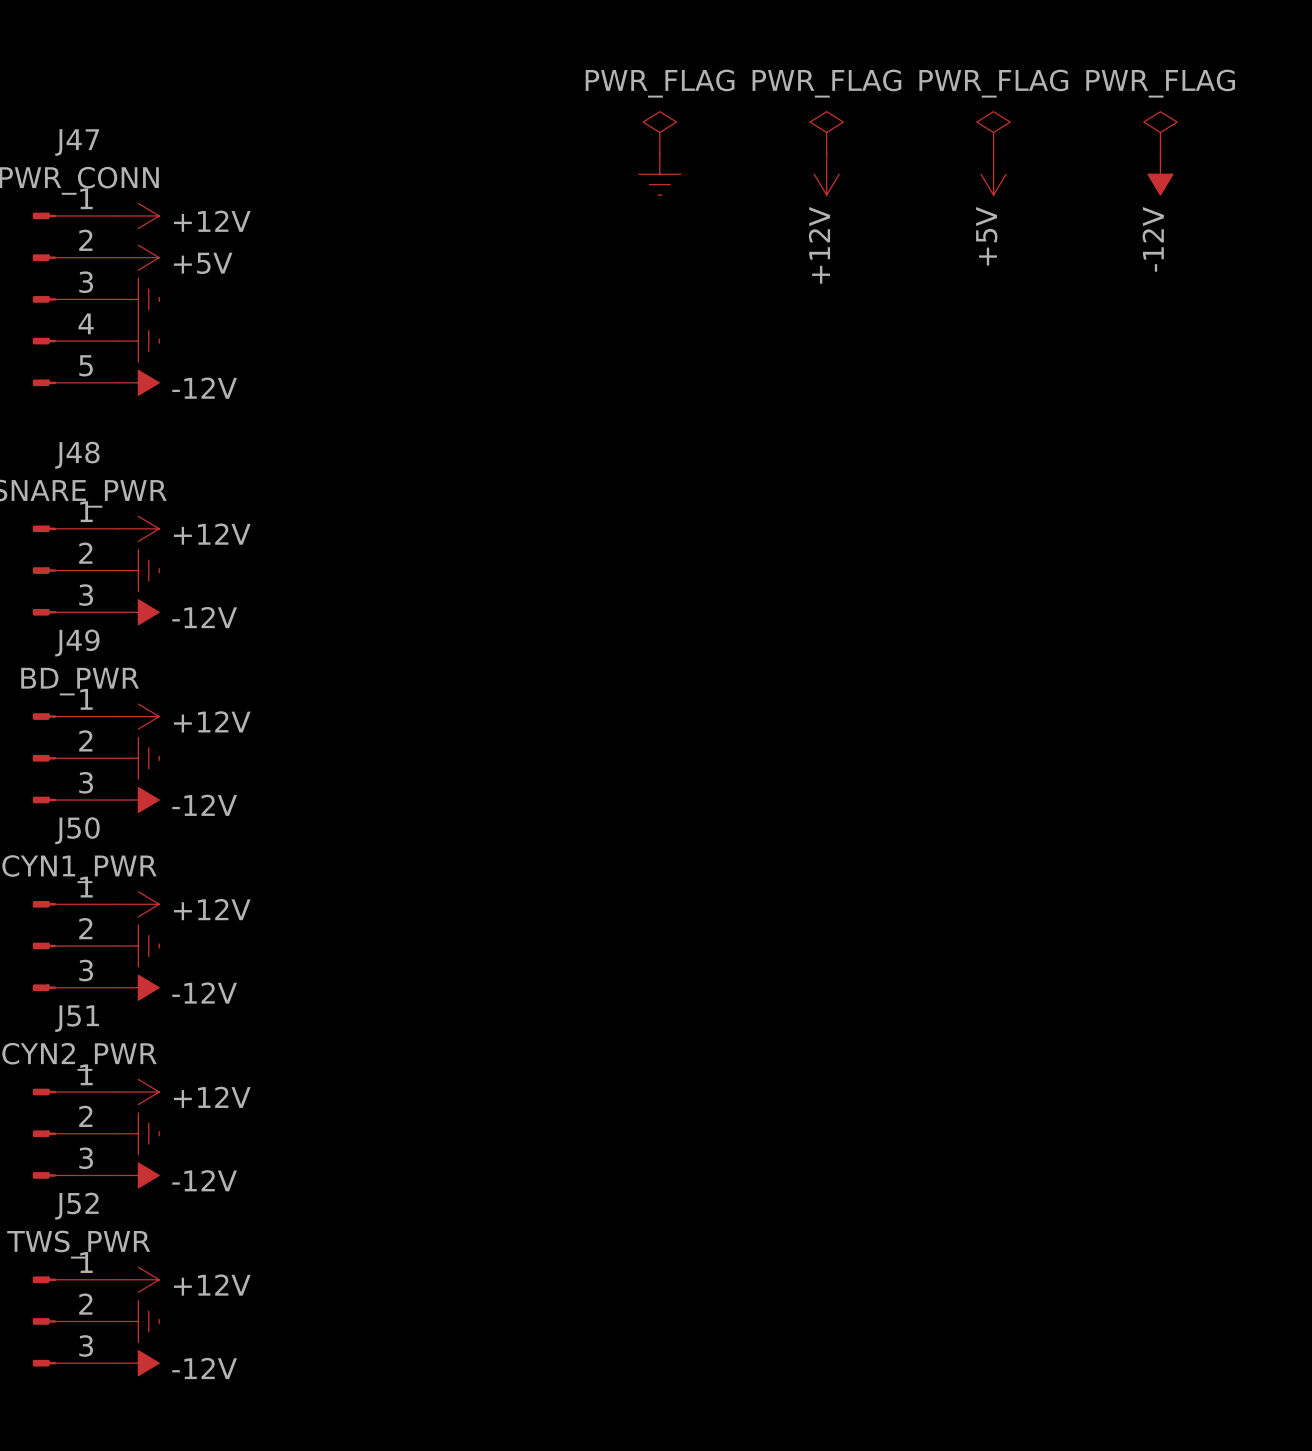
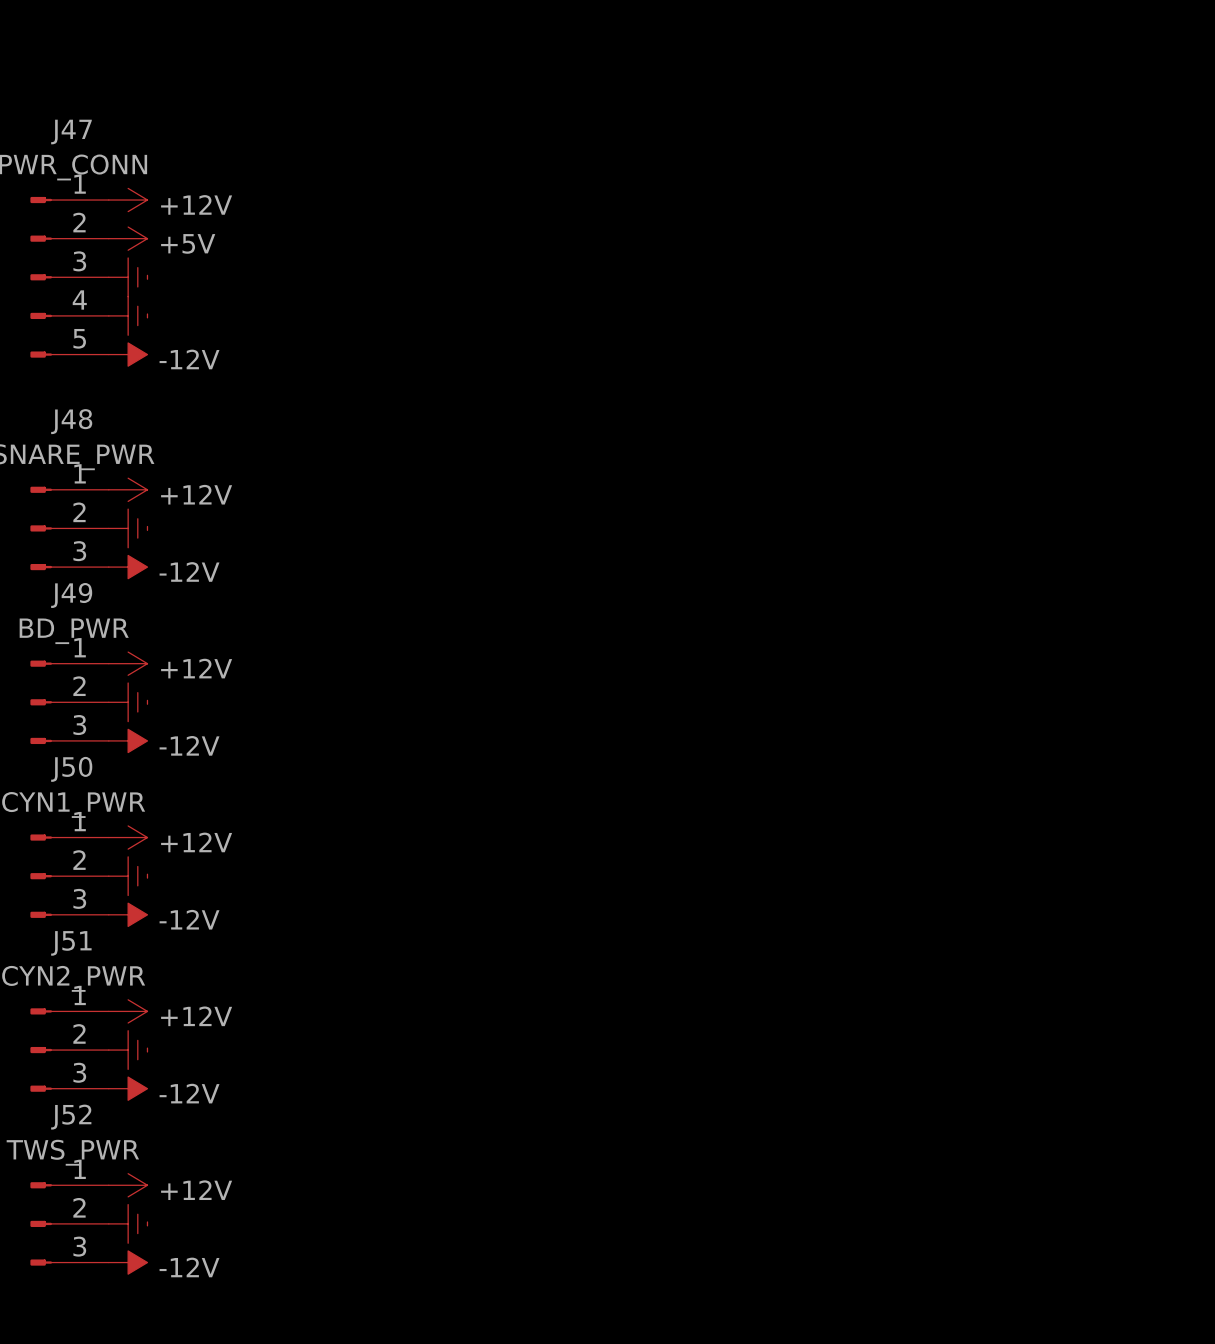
power symbol: PWR_FLAG (659, 132) -> none
power symbol: PWR_FLAG (826, 132) -> none
power symbol: PWR_FLAG (993, 132) -> none
power symbol: PWR_FLAG (1160, 132) -> none
power symbol: (659, 174) -> none
power symbol: +12V (826, 174) -> none
power symbol: +5V (993, 174) -> none
power symbol: -12V (1160, 174) -> none

